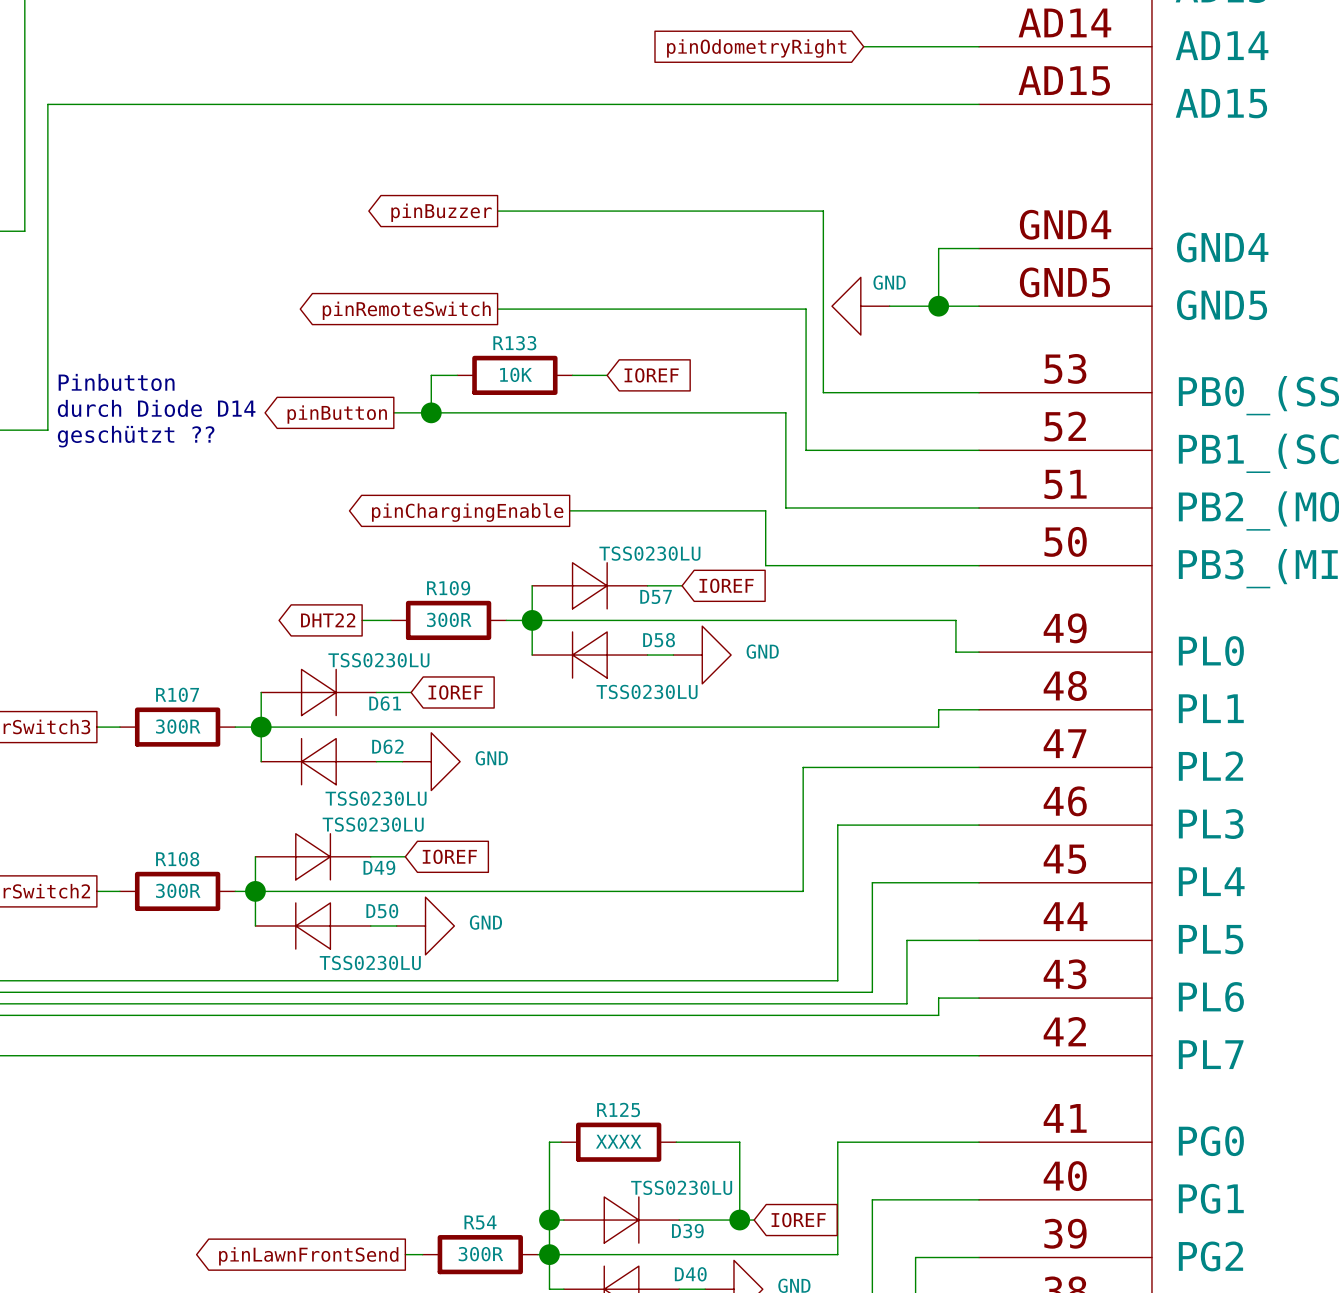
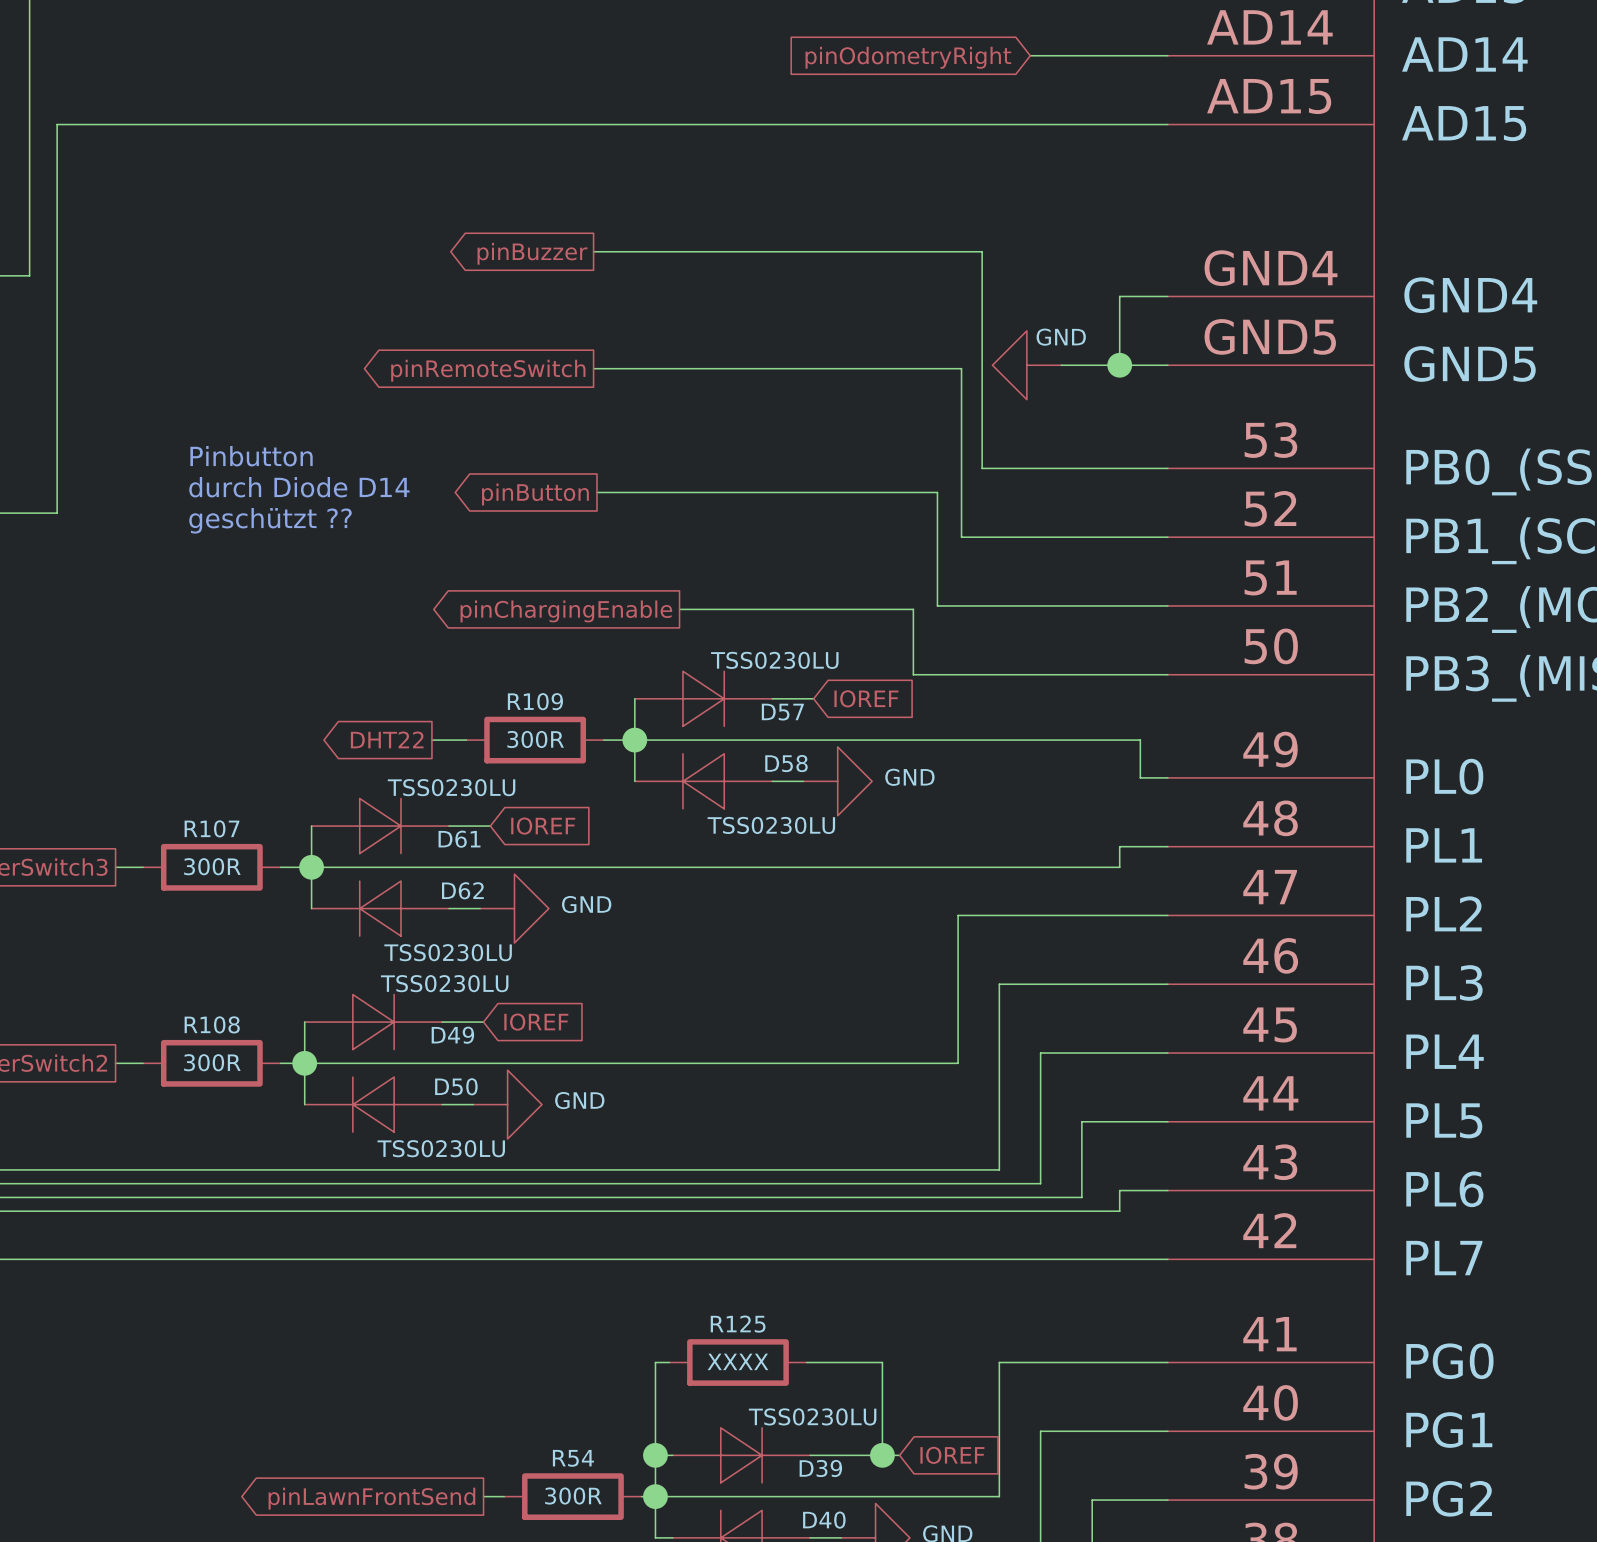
wire: (457, 375) (431, 375) (431, 412) -> none
R133: 10K (514, 375) -> none
wire: (572, 375) (607, 375) -> none
global label: IOREF (651, 375) -> none
text position: Pinbutton (116, 382) -> Pinbutton (251, 456)
text position: durch Diode D14 (156, 408) -> durch Diode D14 (299, 487)
wire: (393, 412) (500, 412) -> none
junction: (431, 412) -> none
global label position: pinButton (337, 414) -> pinButton (535, 494)
text position: geschützt ?? (136, 436) -> geschützt ?? (270, 520)

